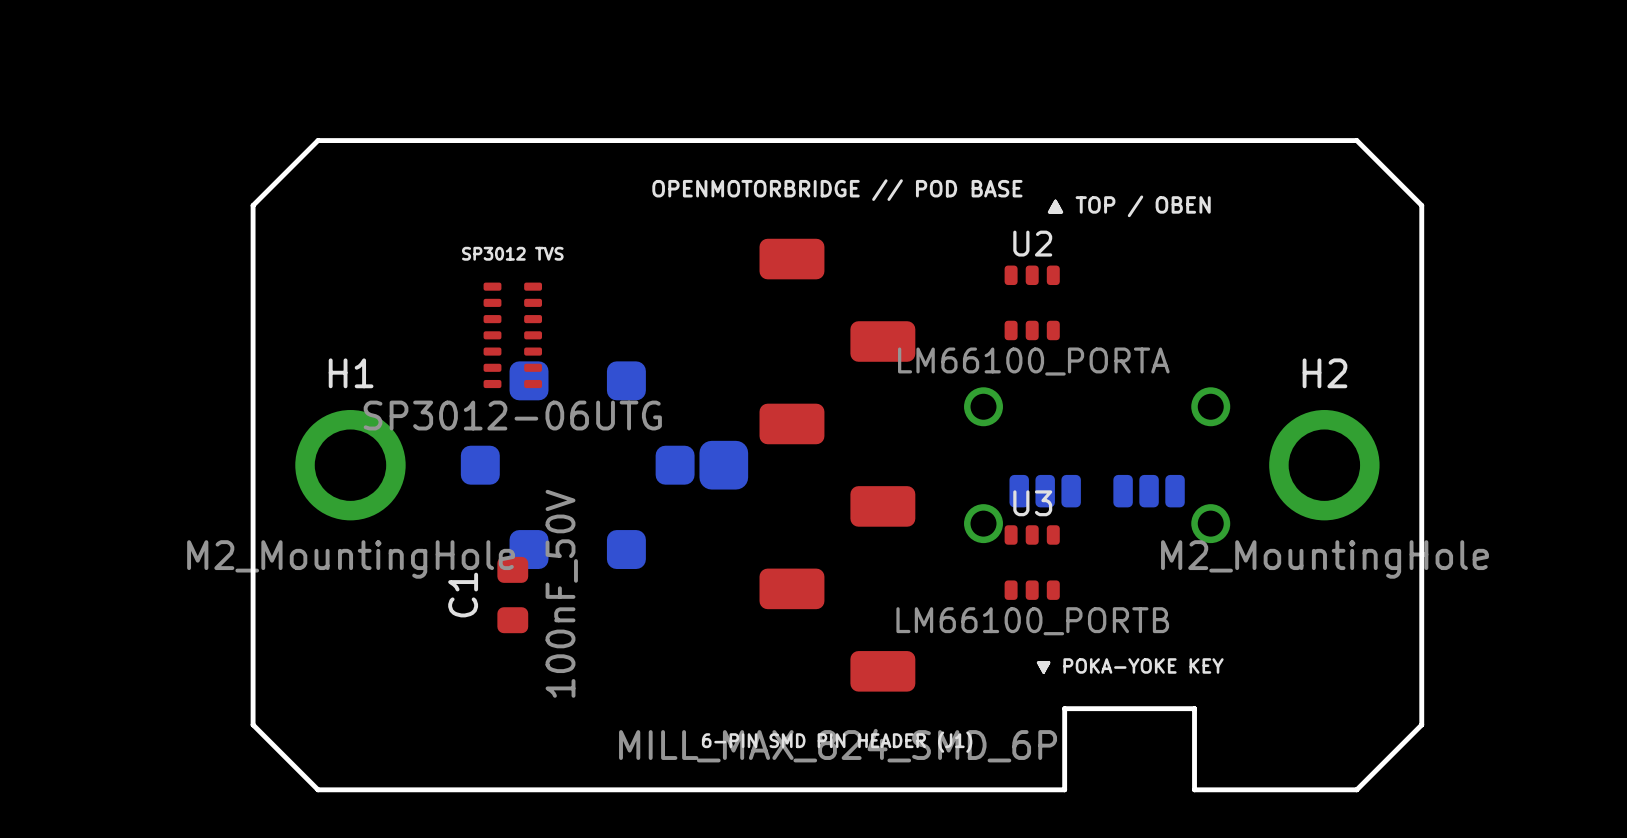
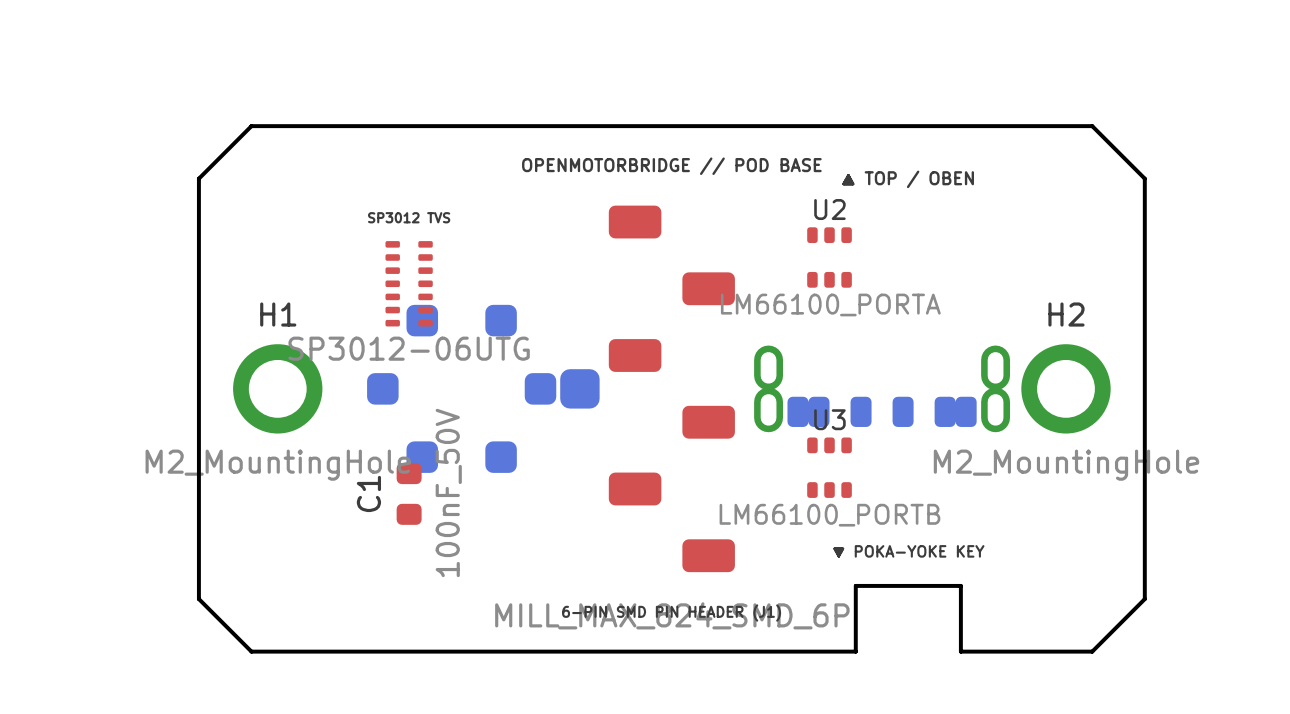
part footprint: [964, 387, 1231, 544] -> [754, 345, 1011, 433]

